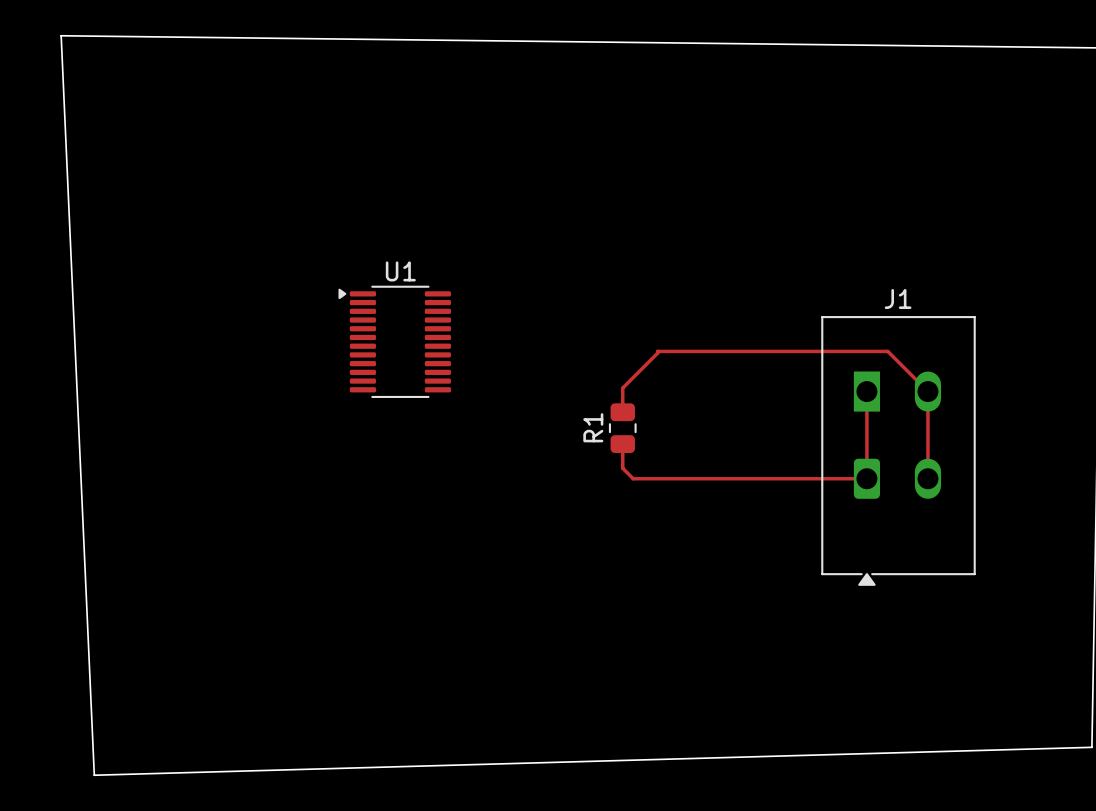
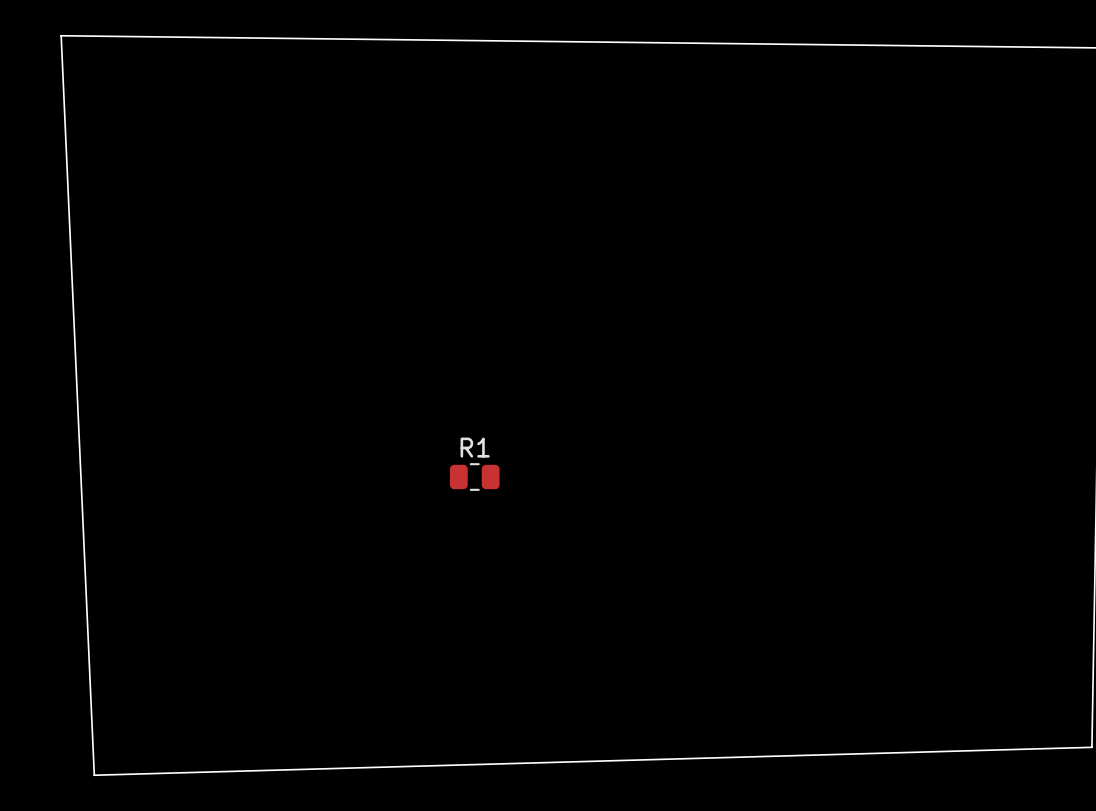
U1: (394, 341) -> none
track: (866, 391) (866, 478) (633, 478) (622, 468) (622, 444) -> none
track: (622, 412) (622, 388) (657, 351) (887, 351) (927, 391) (927, 478) -> none
R1 rotation: 0° (622, 428) -> 90° clockwise (474, 477)
R1 position: (622, 428) -> (474, 477)
J1: (898, 450) -> none

